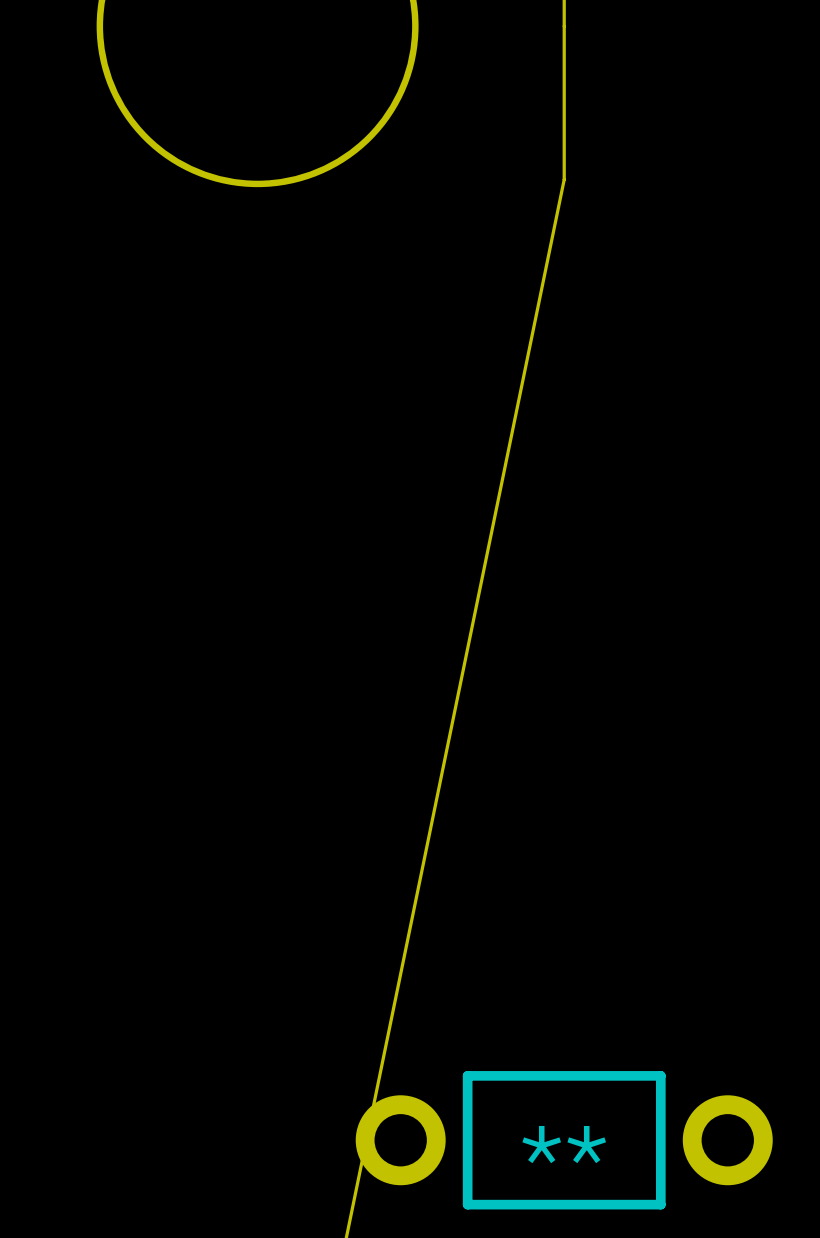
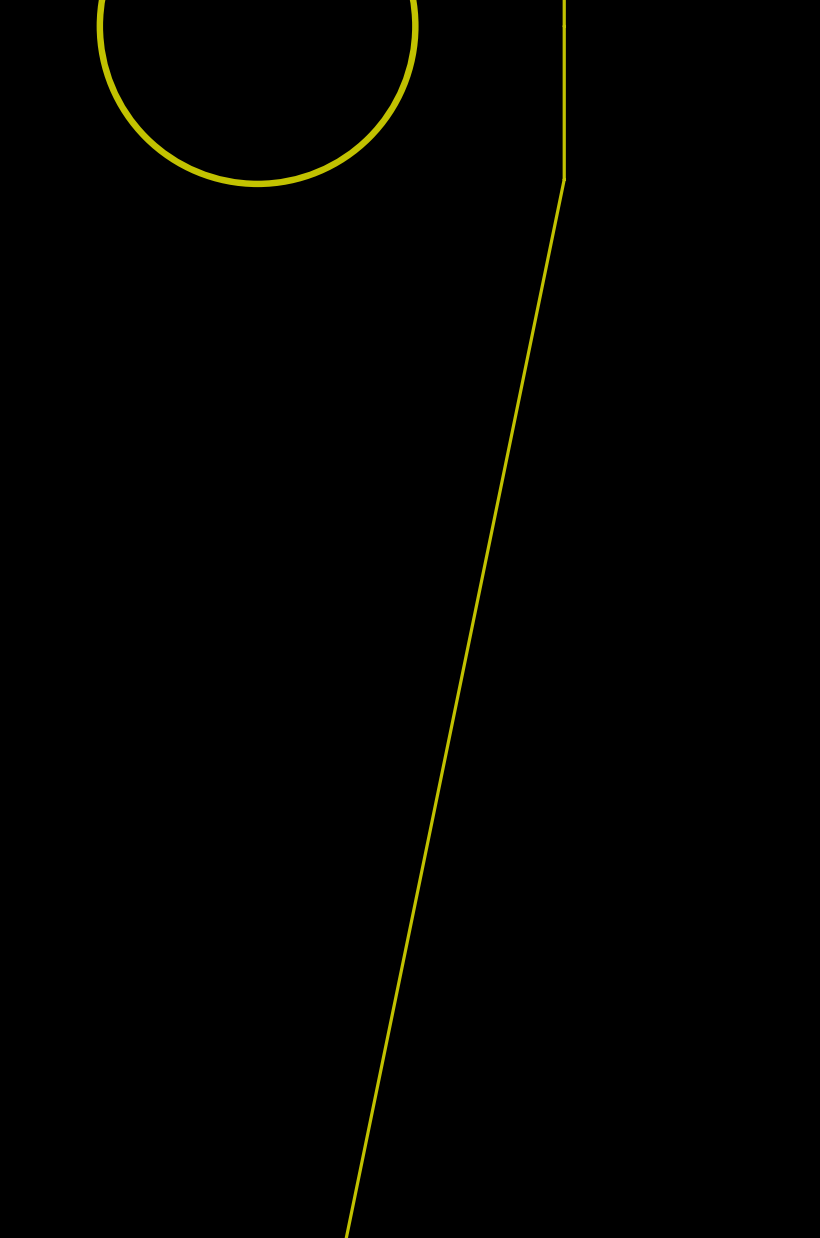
part: (564, 1140) -> none

